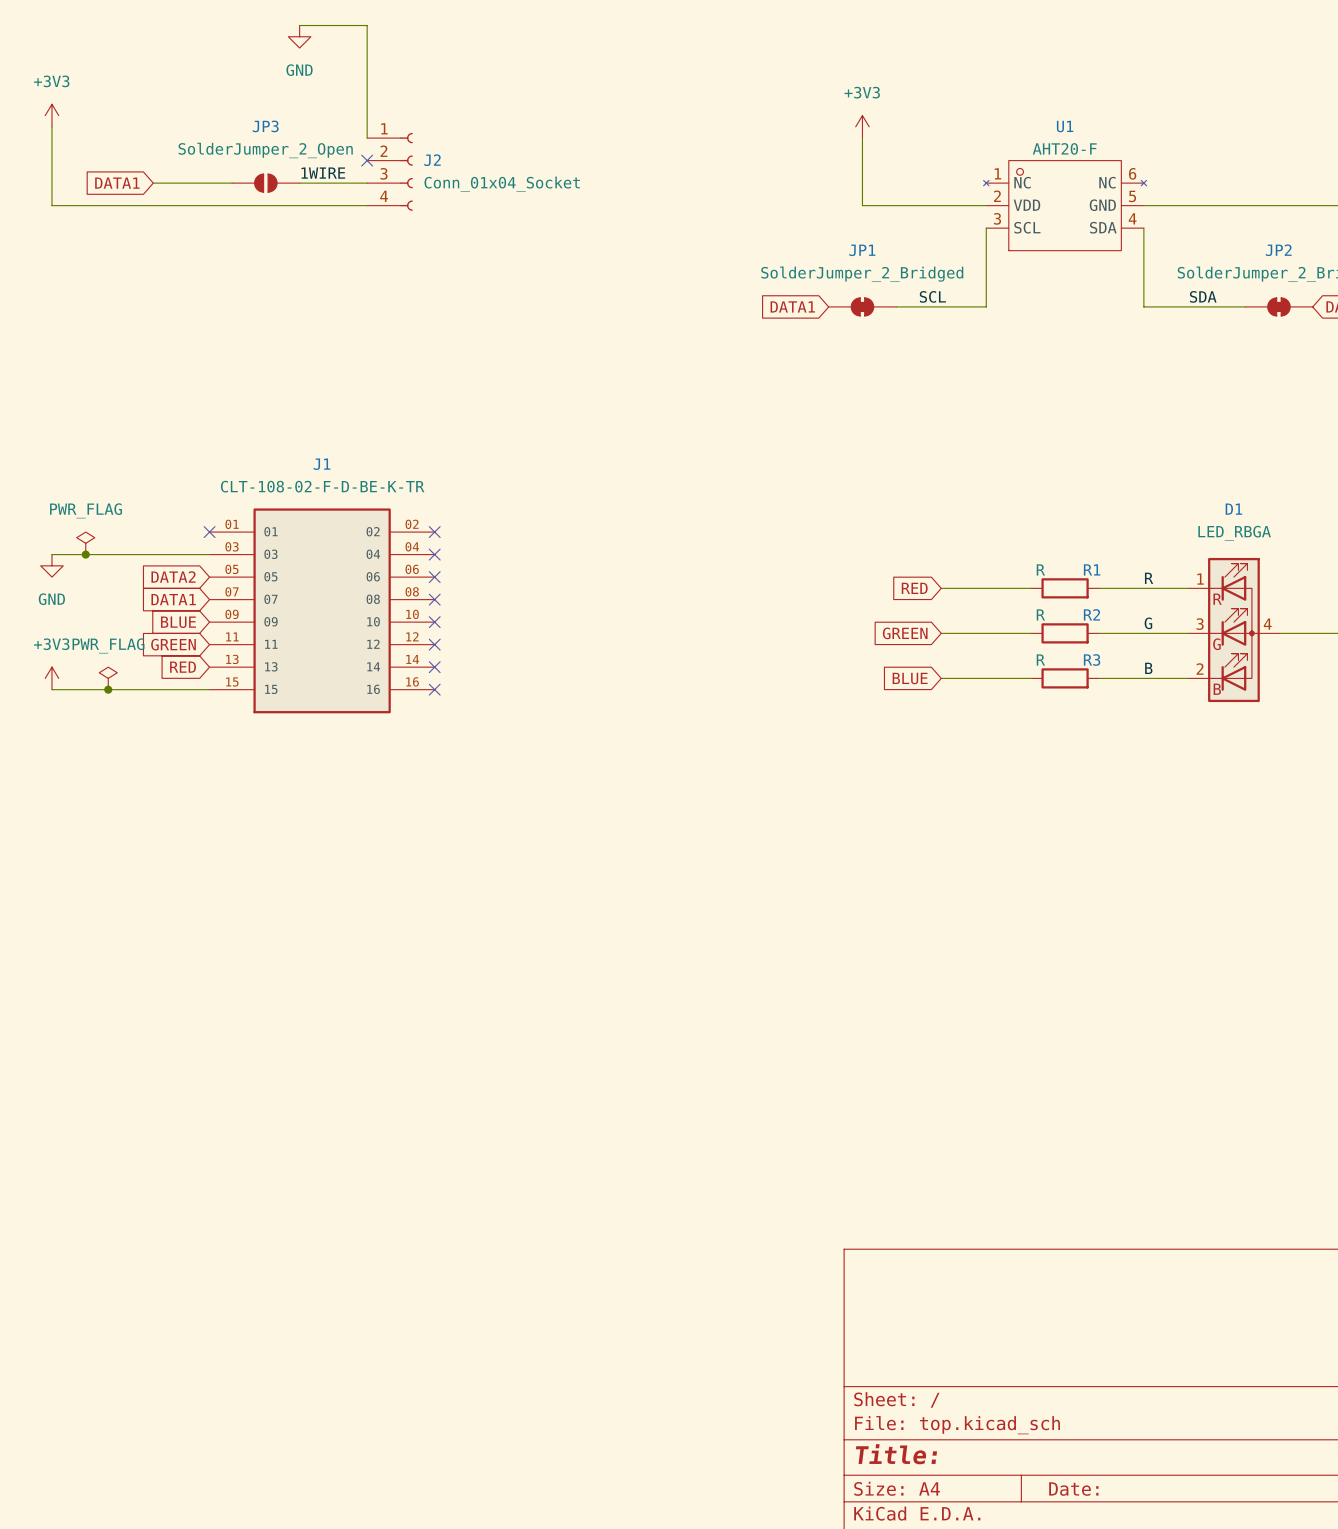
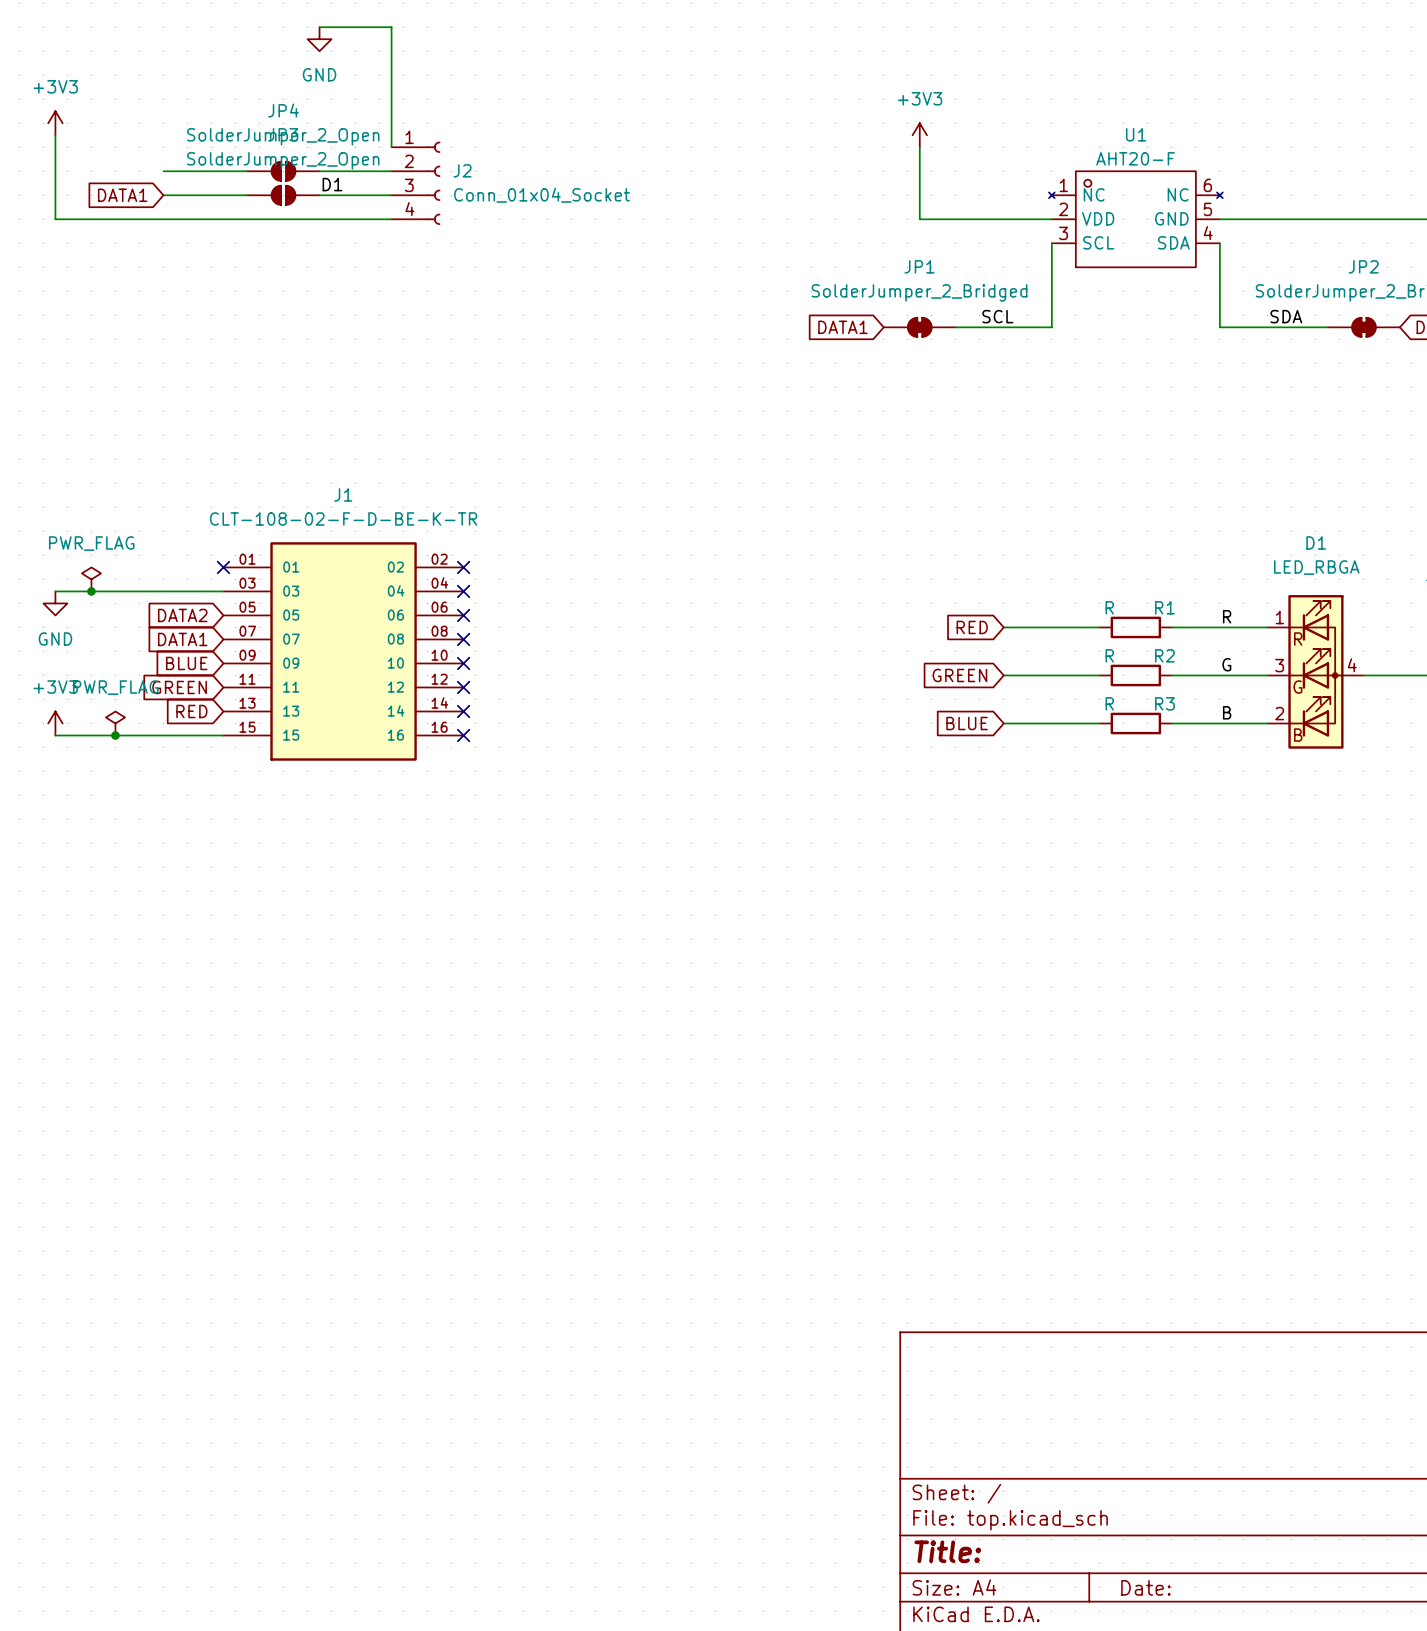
wire: none -> (163, 171) (247, 171)
JP4: none -> SolderJumper_2_Open (283, 171)
wire: none -> (319, 171) (391, 171)
no-connect mark: (367, 160) -> none
label: 1WIRE (323, 173) -> D1 (332, 184)

